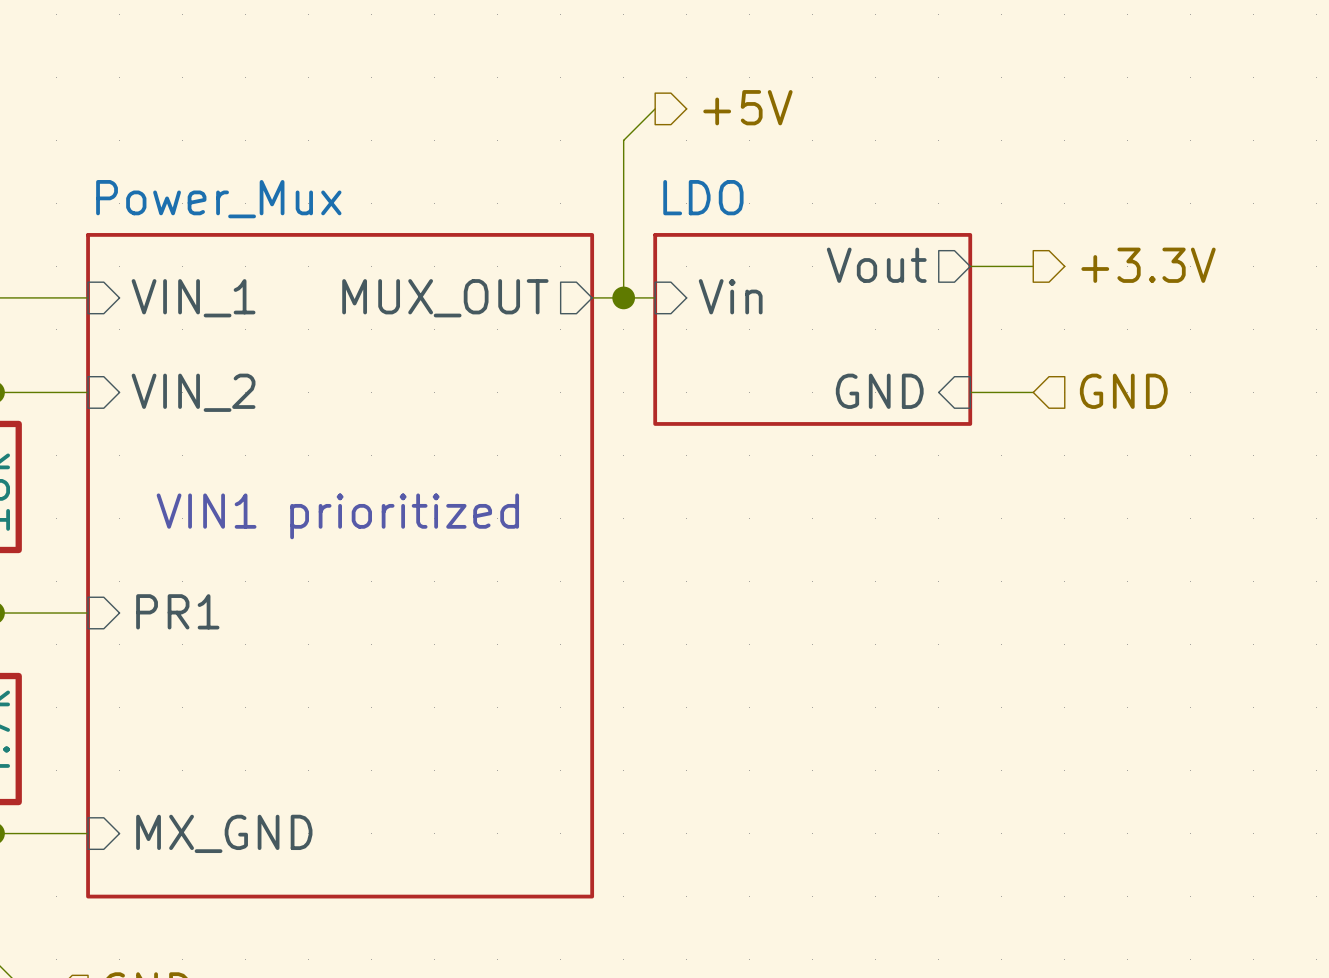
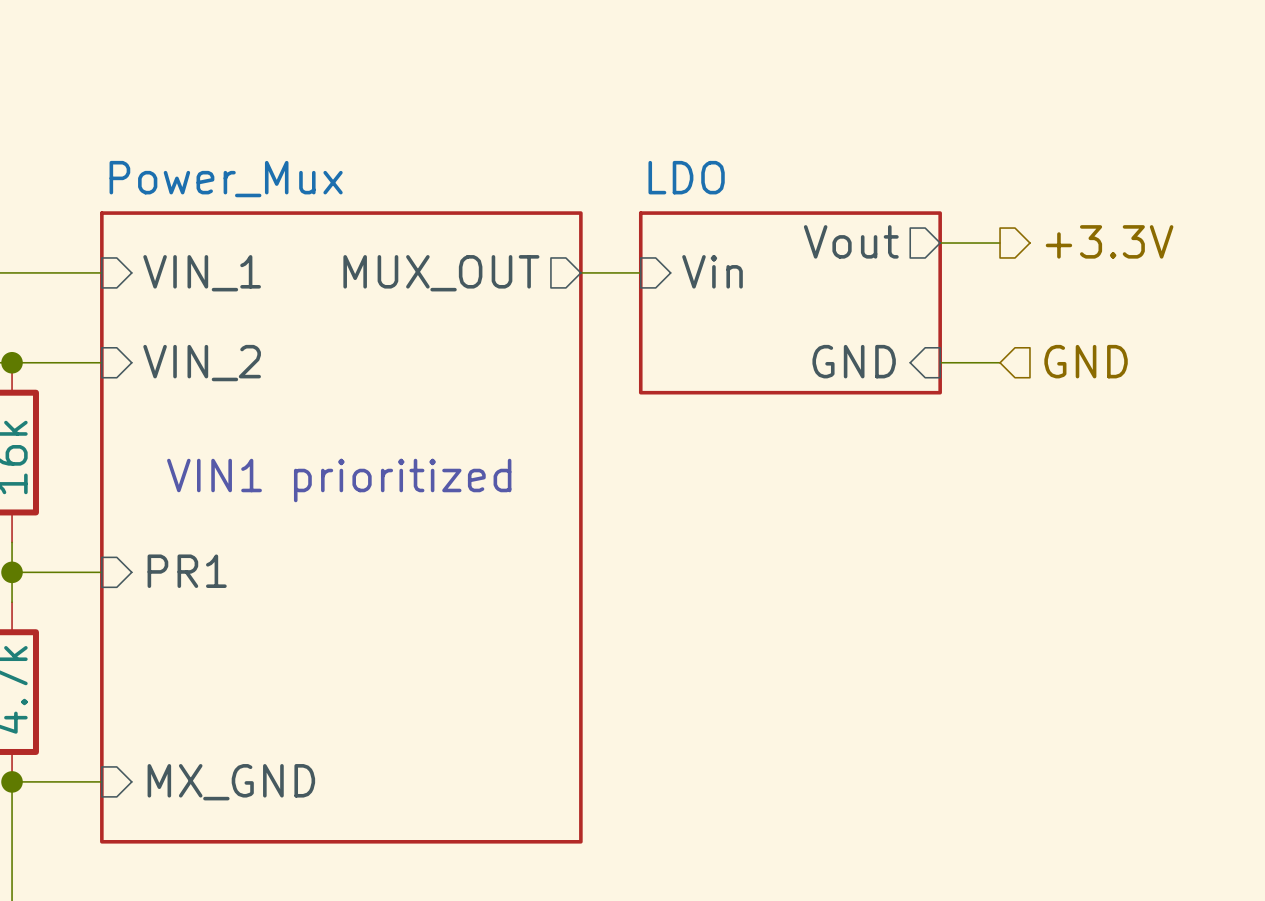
hierarchical label: +5V (747, 107) -> none
wire: (655, 108) (623, 140) (623, 297) -> none
junction: (623, 297) -> none

